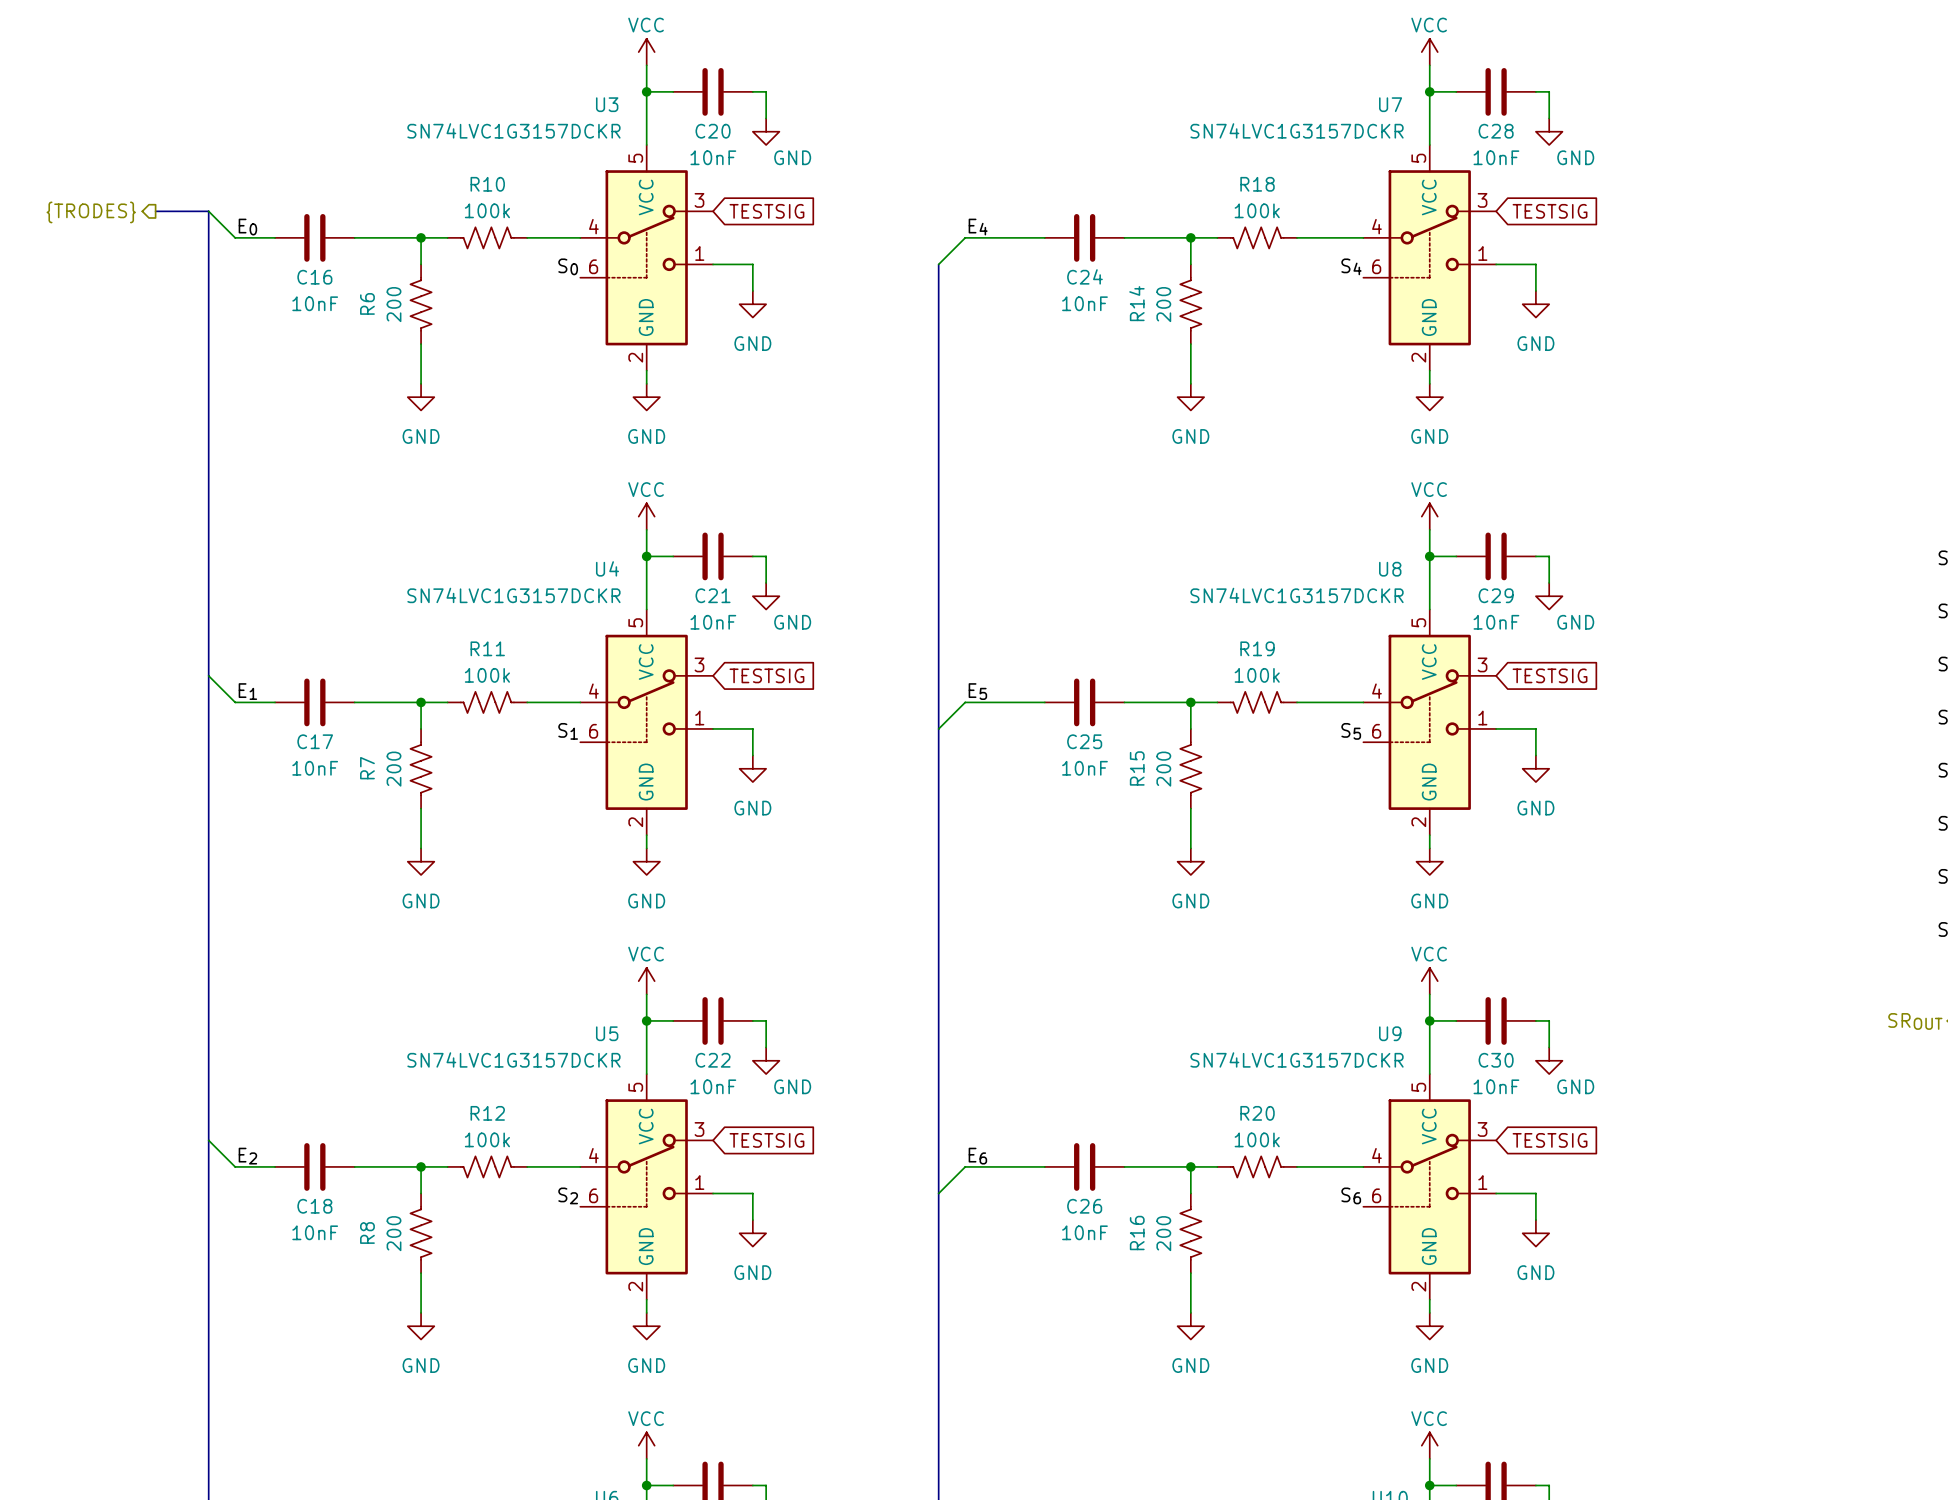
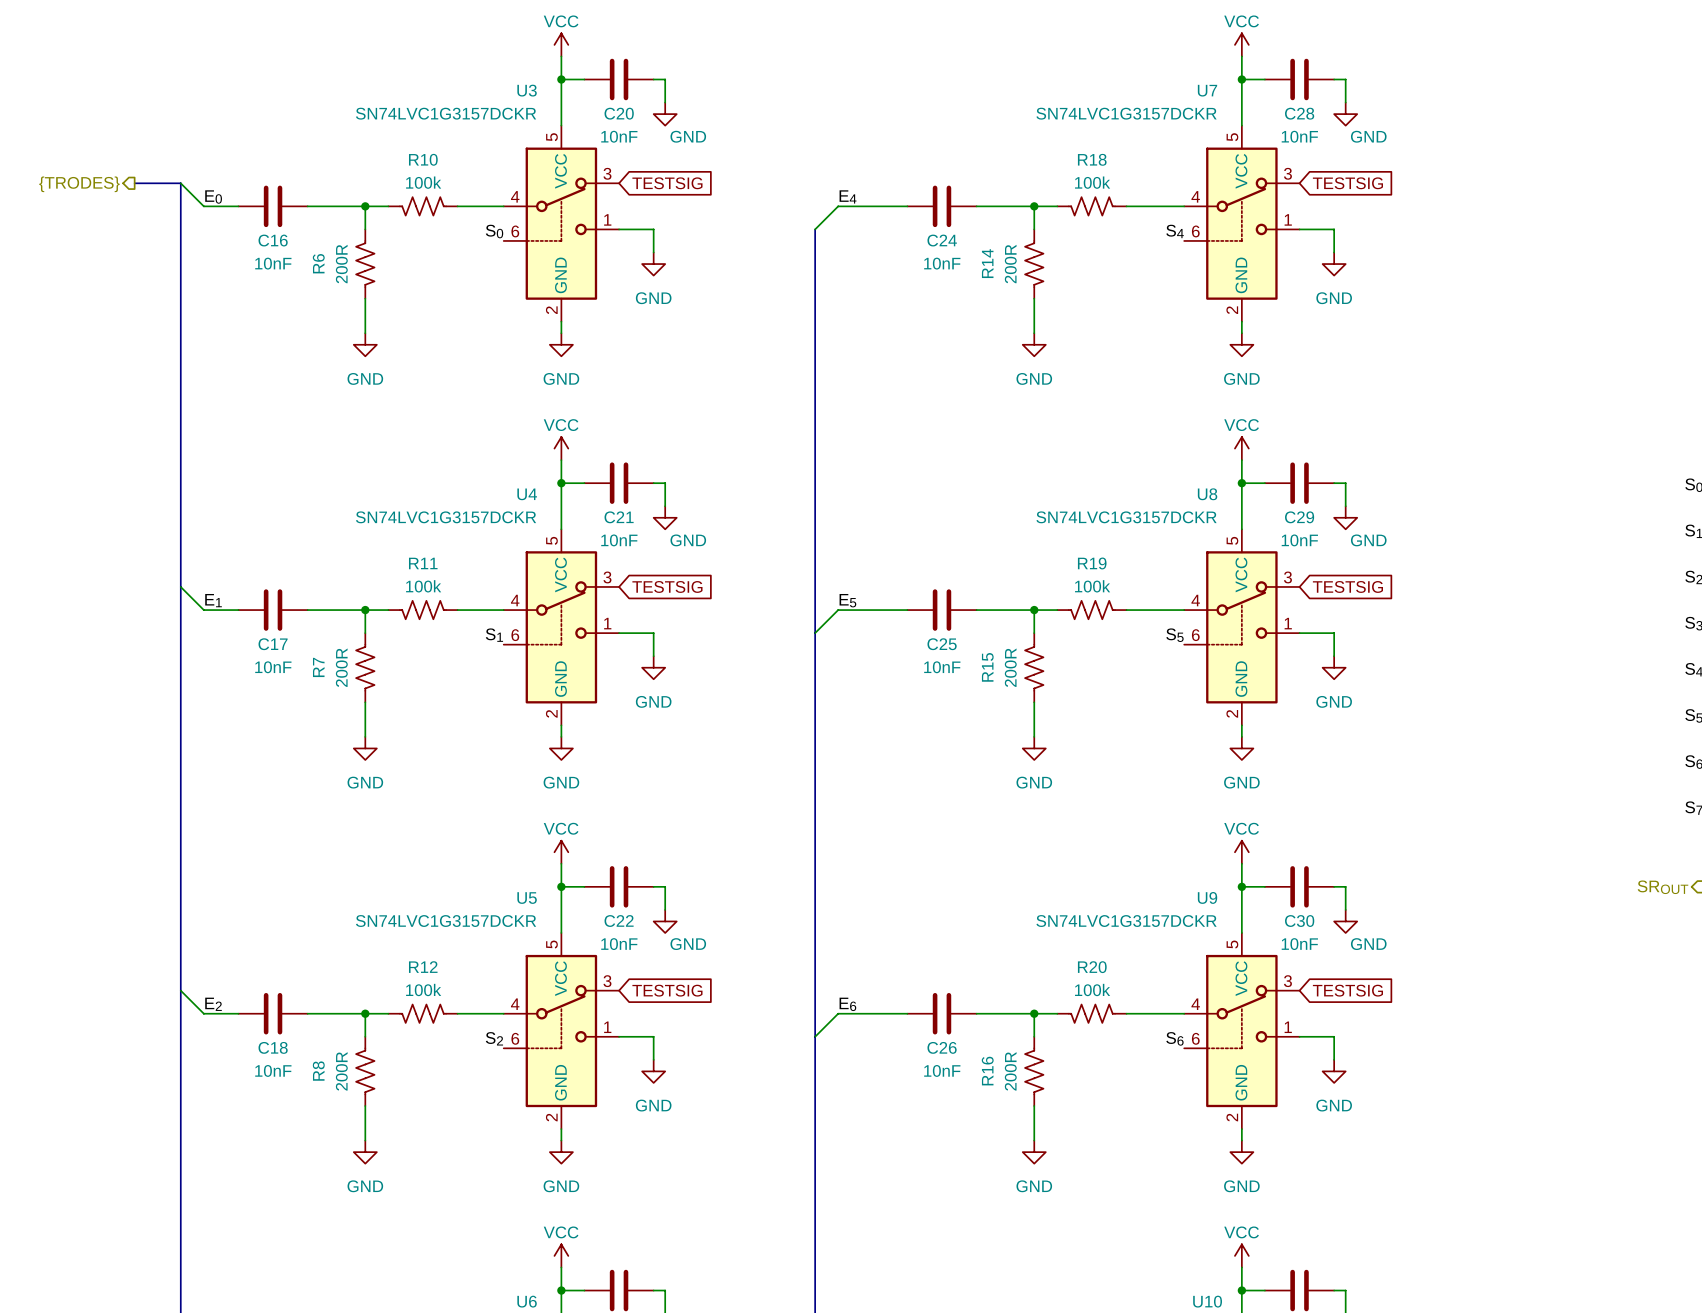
R6 value: 200 (394, 304) -> 200R (341, 264)
R14 value: 200 (1163, 304) -> 200R (1010, 264)
R7 value: 200 (394, 769) -> 200R (341, 667)
R15 value: 200 (1163, 769) -> 200R (1010, 667)
R8 value: 200 (394, 1233) -> 200R (341, 1071)
R16 value: 200 (1163, 1233) -> 200R (1010, 1071)

